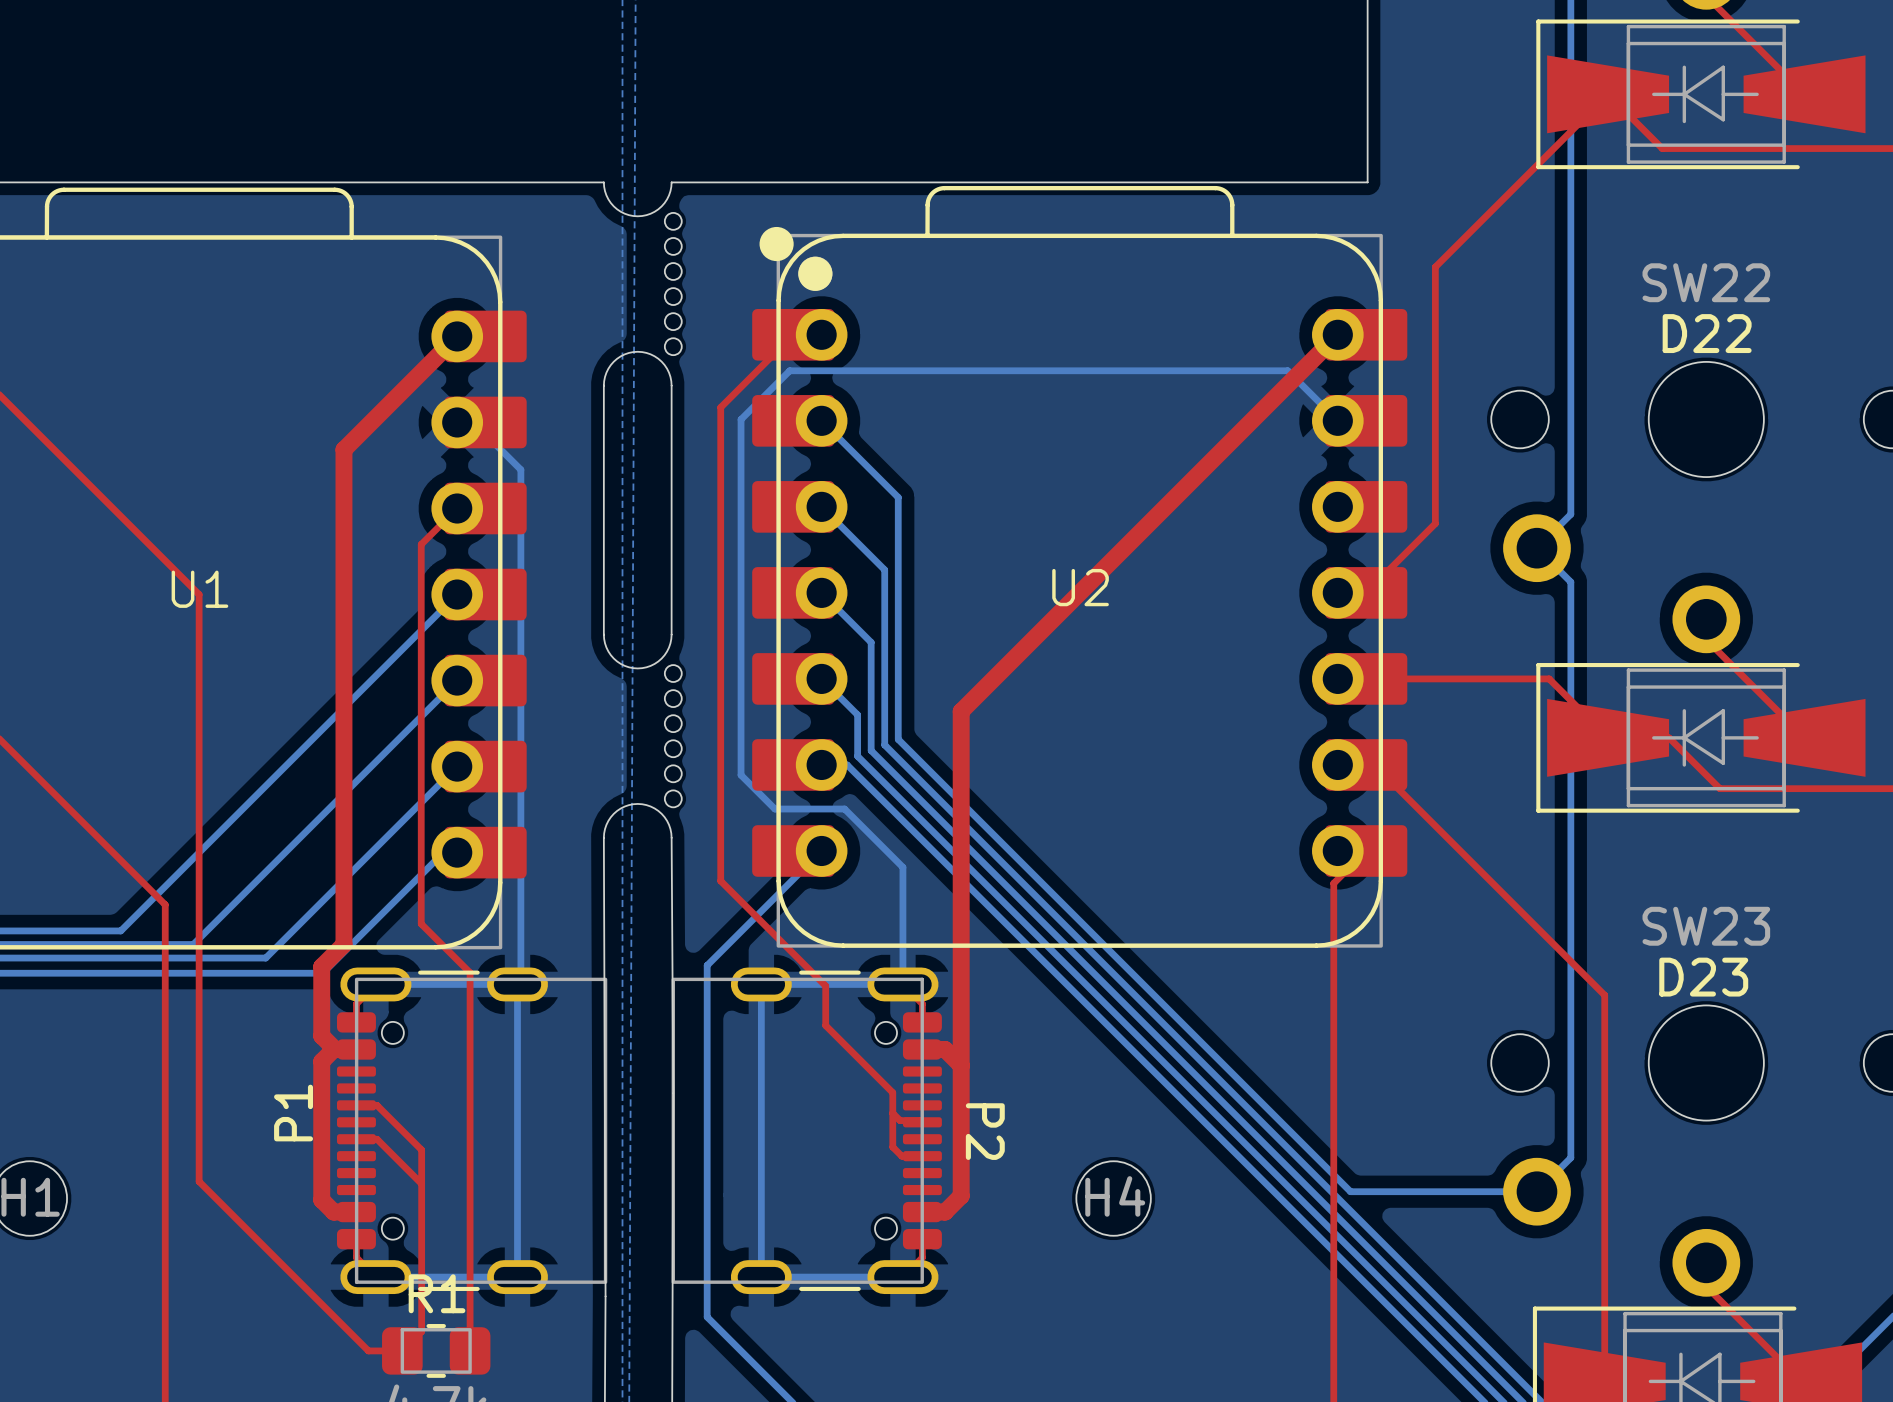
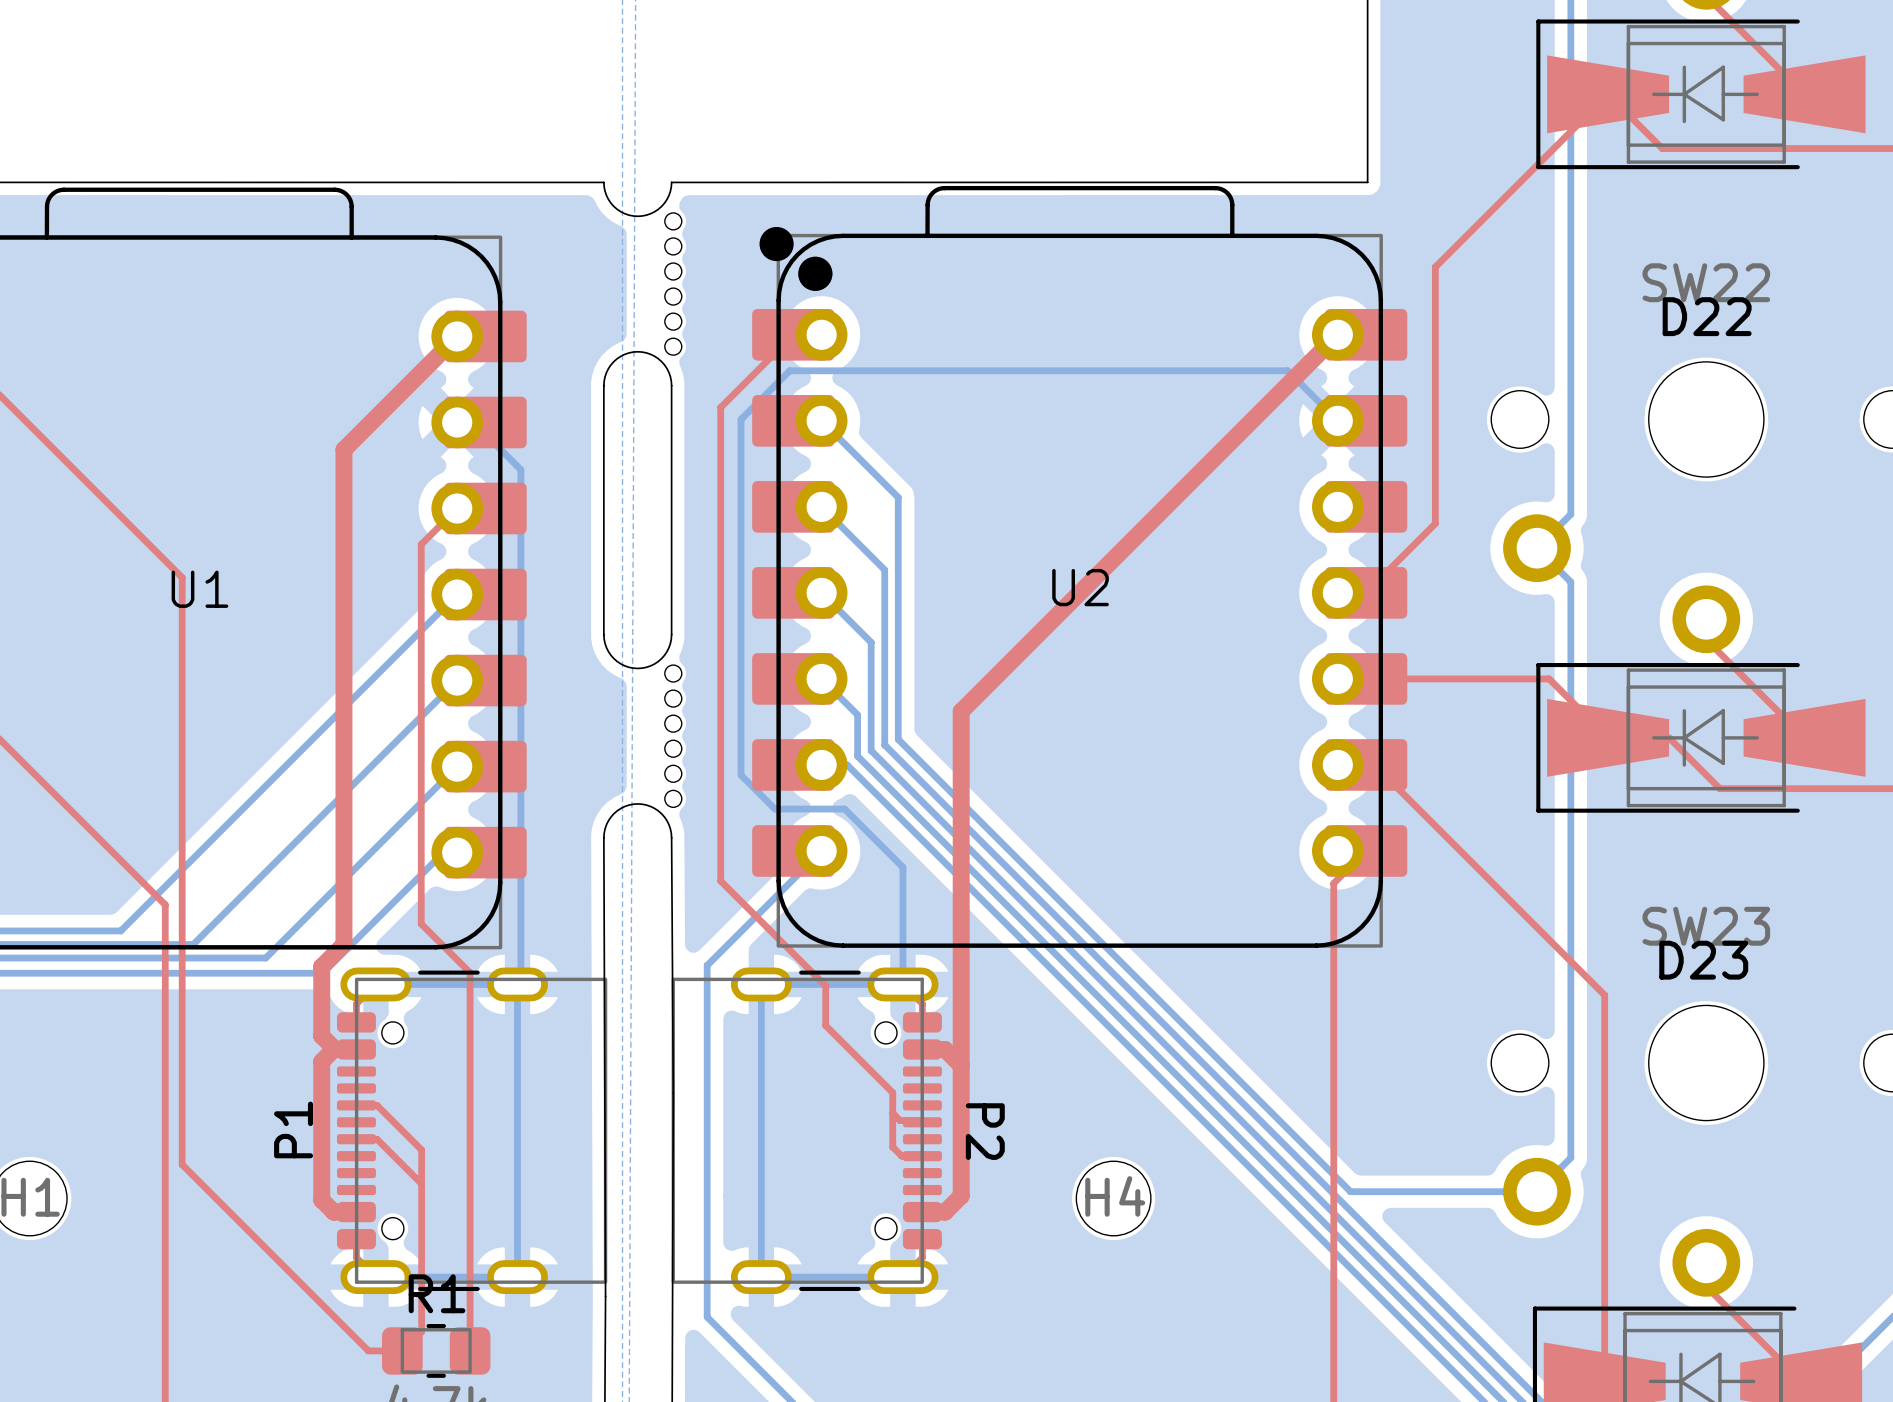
D22 name position: D22 (1707, 333) -> D22 (1707, 316)
top track: (182, 577) (199, 594) (199, 1181) -> (182, 577) (182, 1164) (199, 1181)
D23 name position: D23 (1703, 977) -> D23 (1703, 960)
P1 name position: P1 (293, 1113) -> P1 (293, 1129)

